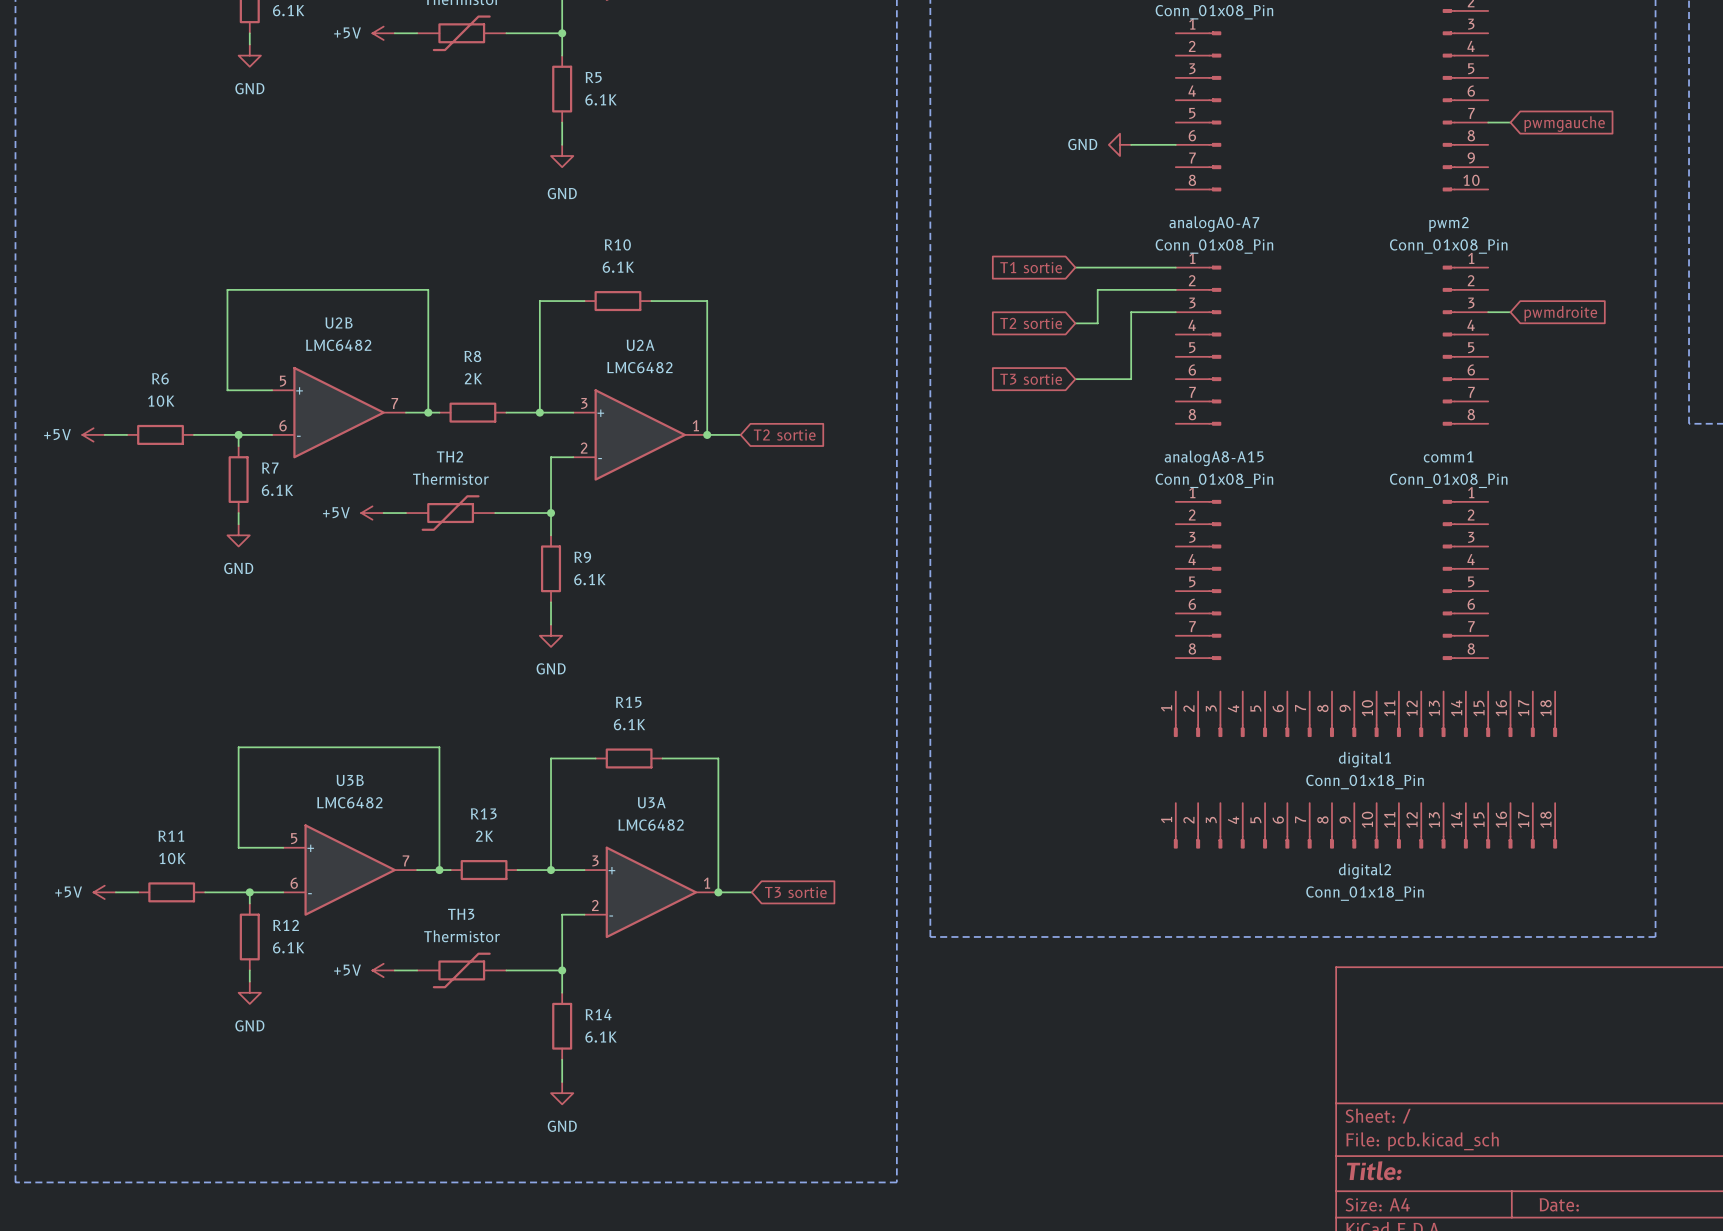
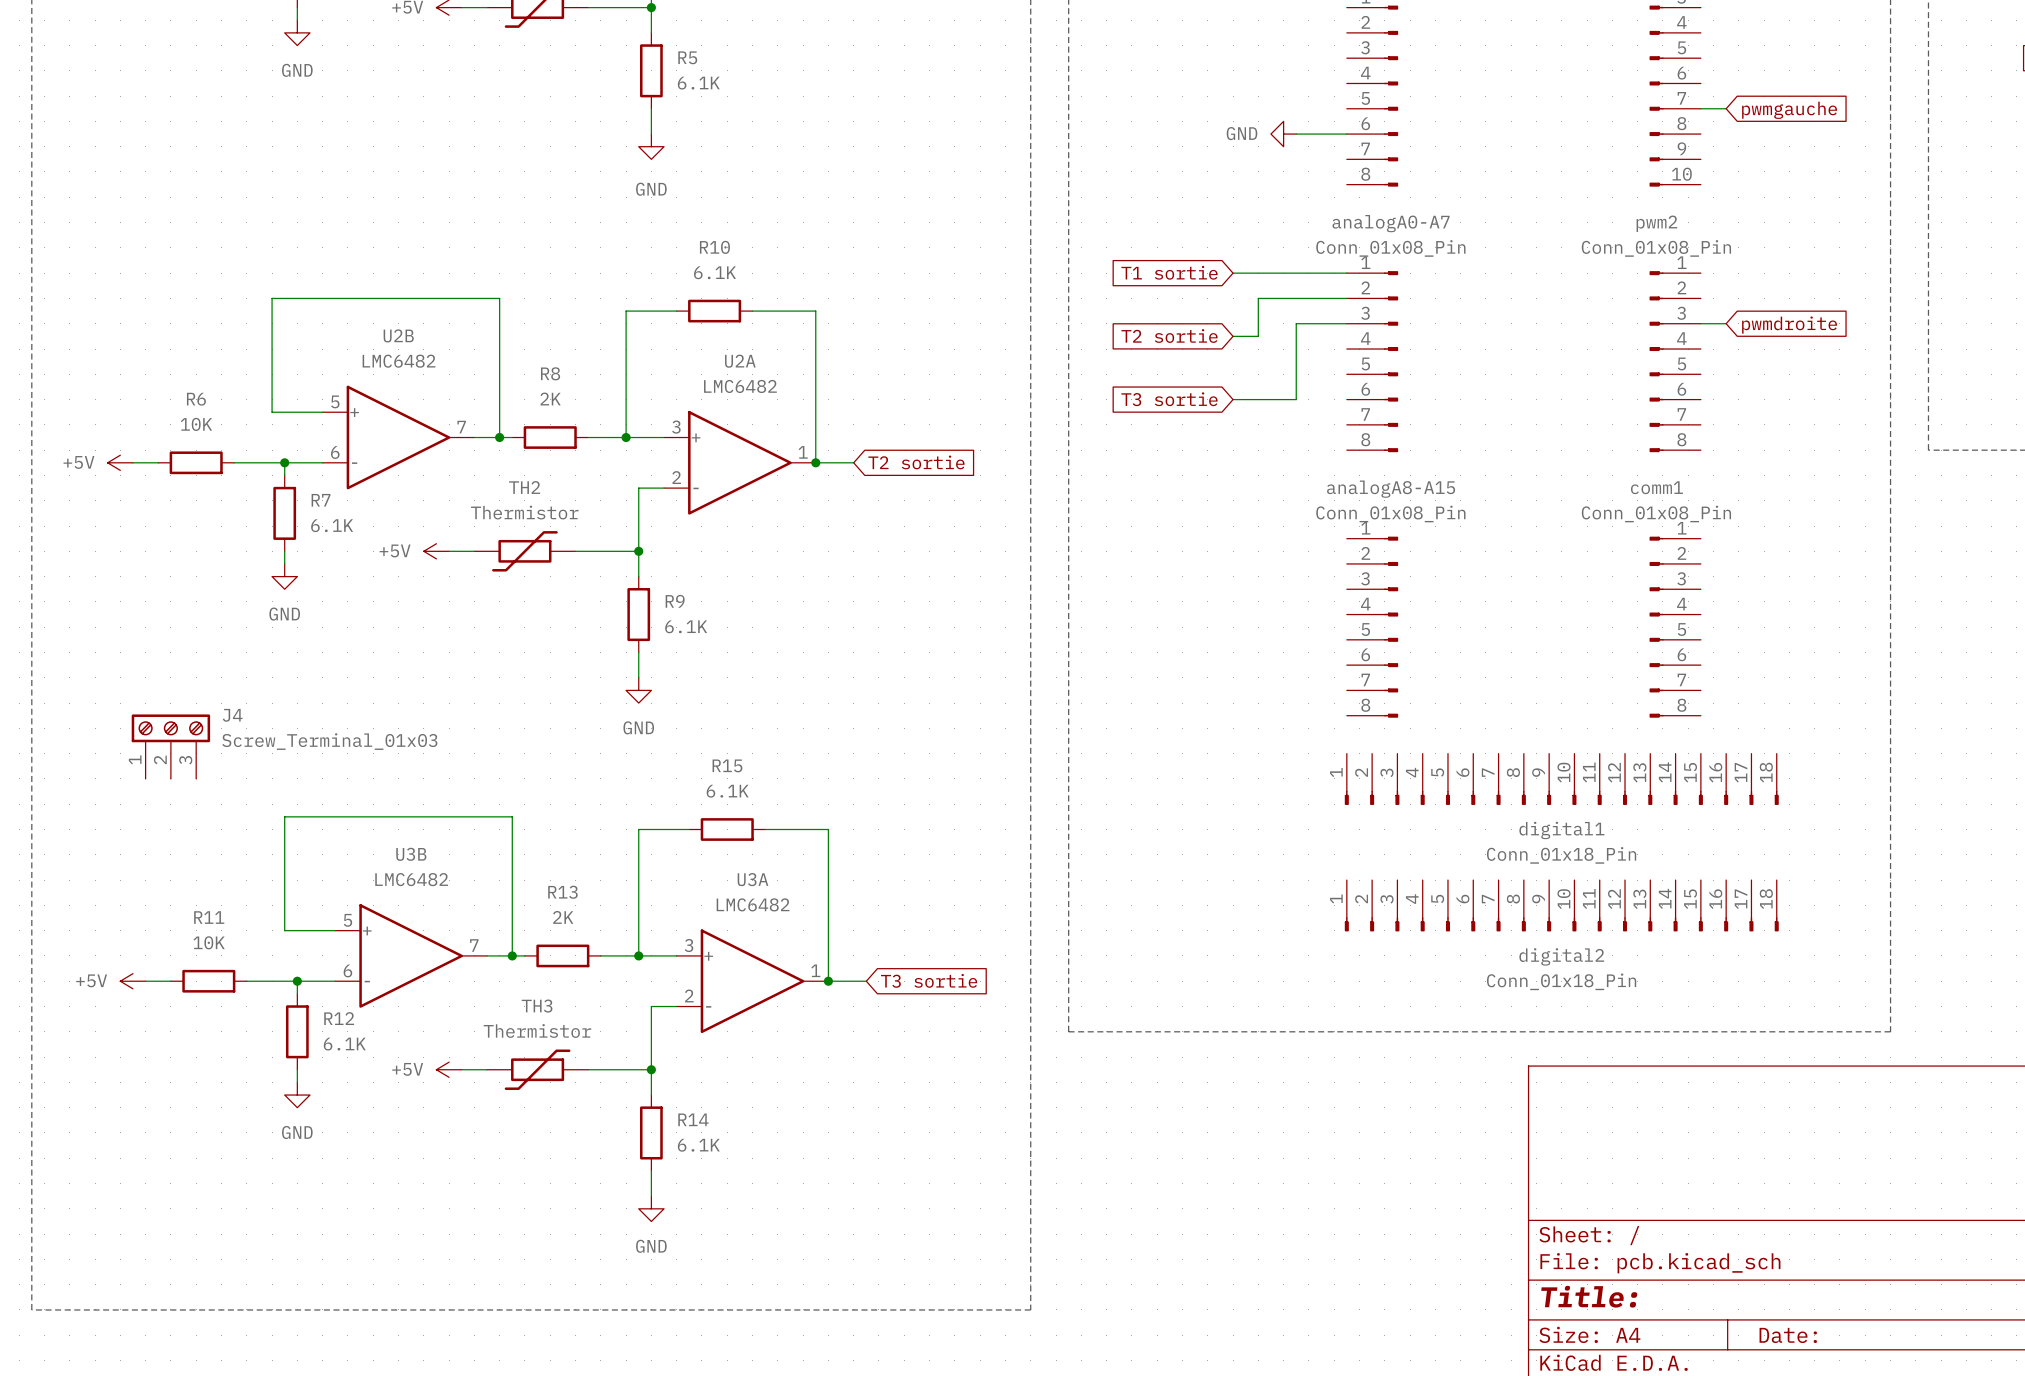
J4: none -> Screw_Terminal_01x03 (170, 746)

